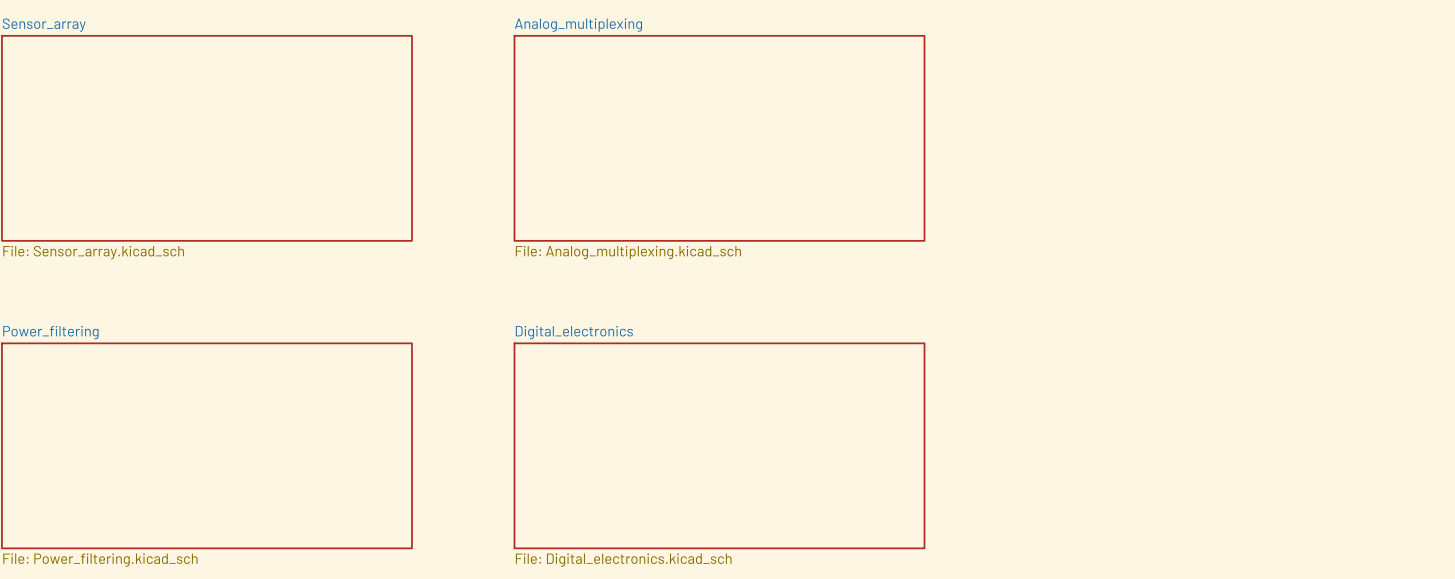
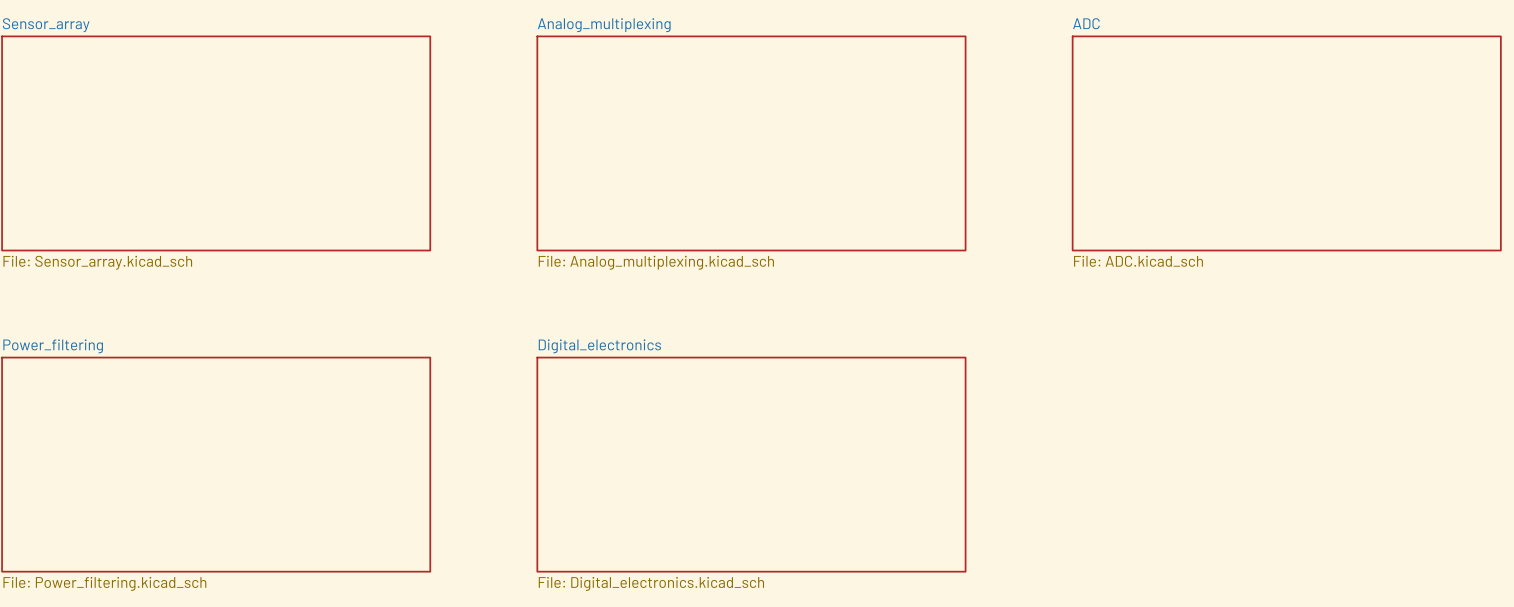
sheet ADC: none -> File: ADC.kicad_sch (1286, 143)

